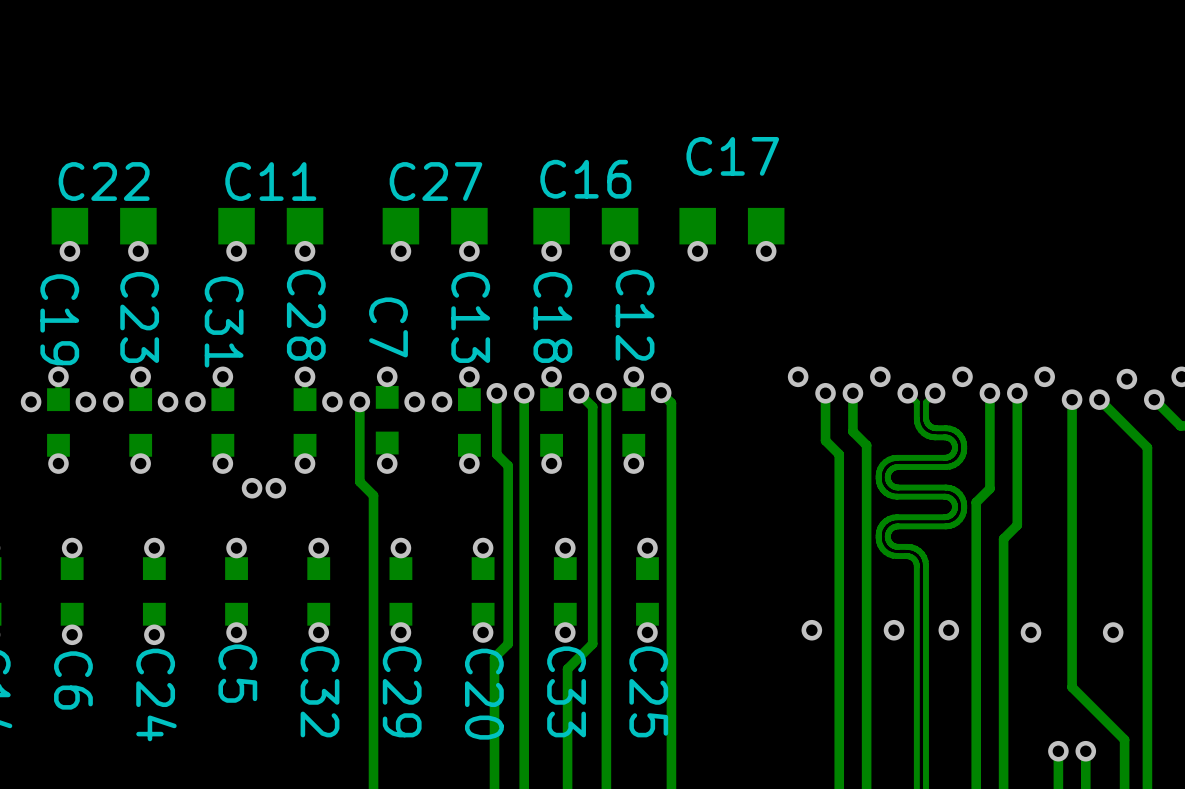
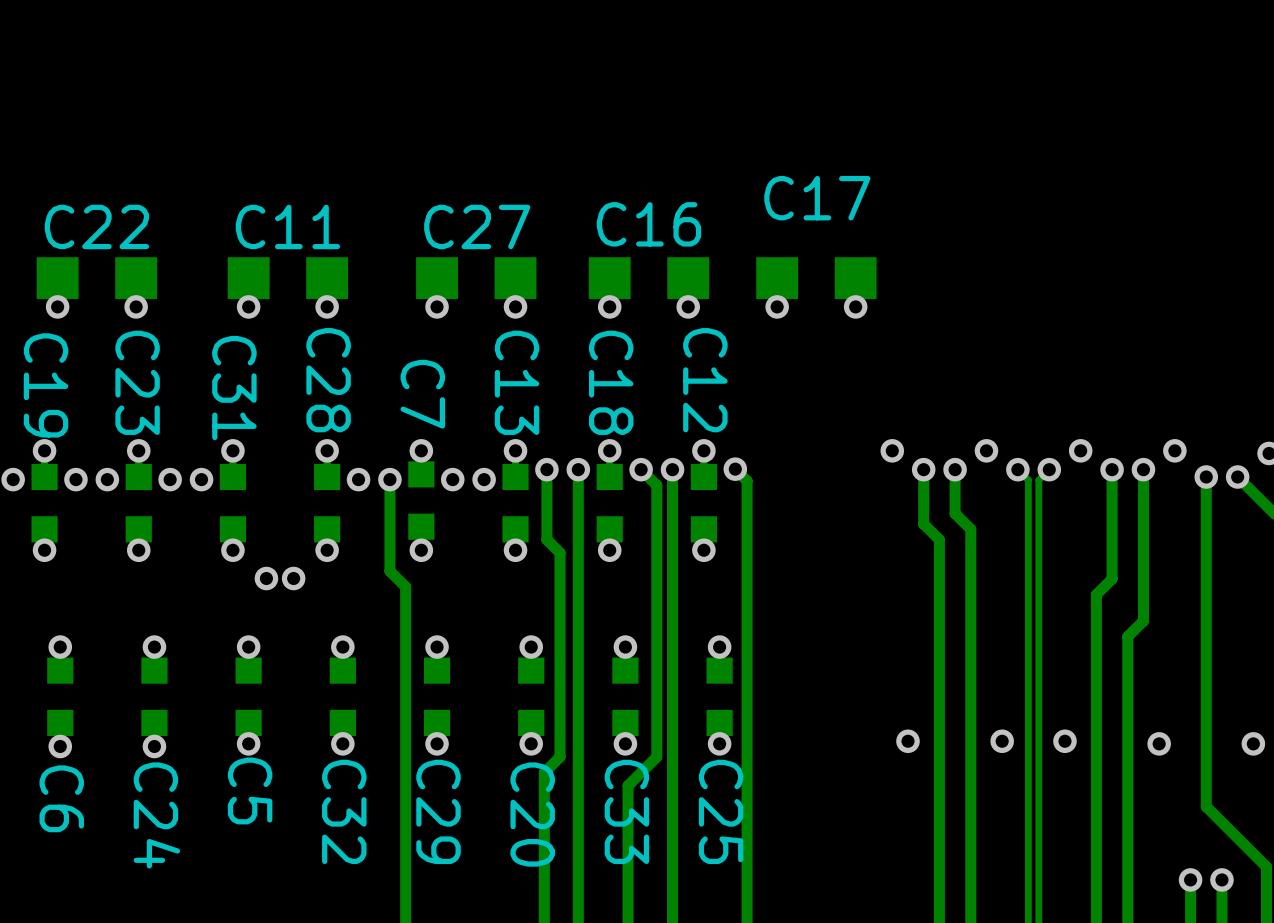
track: (925, 417) (928, 424) (931, 427) (949, 428) (957, 432) (962, 438) (964, 446) (962, 456) (953, 465) (945, 467) (895, 467) (891, 469) (888, 474) (890, 483) (895, 487) (949, 488) (957, 491) (962, 497) (963, 512) (960, 519) (953, 524) (945, 526) (895, 526) (888, 532) (888, 538) (891, 544) (915, 548) (922, 553) (925, 565) -> (1038, 497) (1038, 666)
track: (916, 419) (918, 426) (923, 433) (931, 436) (949, 438) (952, 441) (955, 447) (952, 454) (947, 457) (892, 458) (885, 461) (879, 472) (880, 486) (889, 494) (896, 496) (947, 496) (954, 502) (954, 511) (947, 516) (892, 517) (885, 521) (880, 527) (878, 537) (882, 549) (892, 555) (911, 557) (914, 559) (916, 566) -> (1028, 499) (1028, 668)

